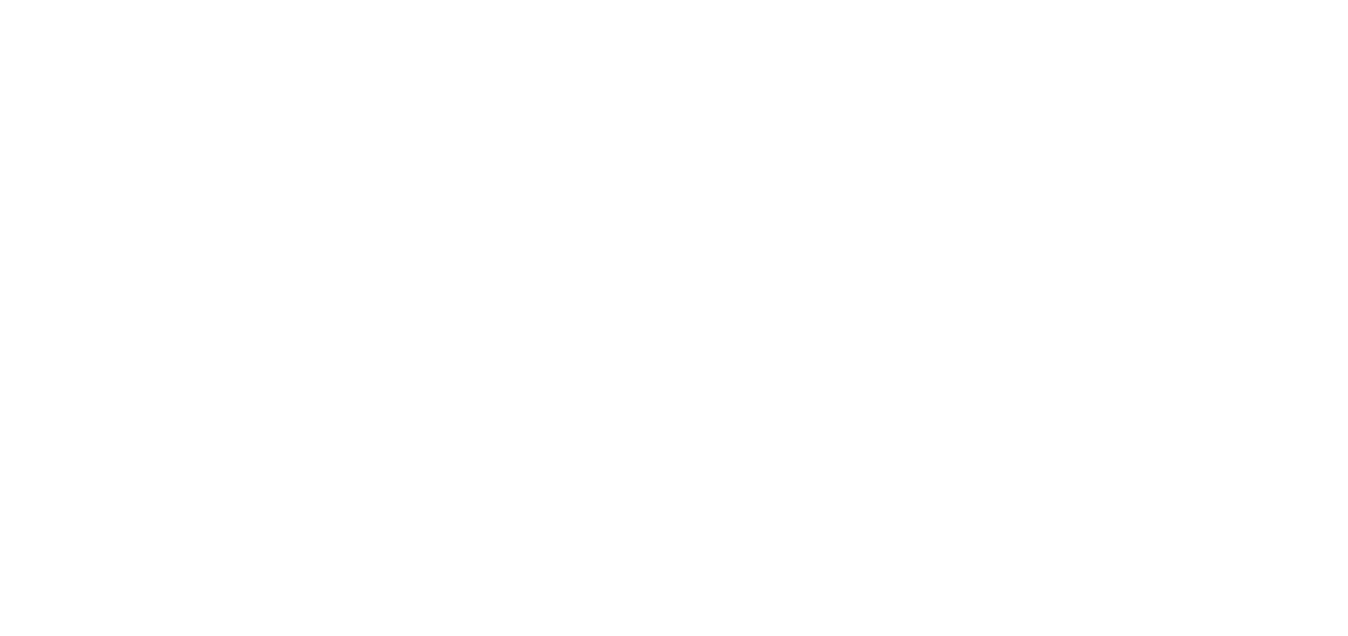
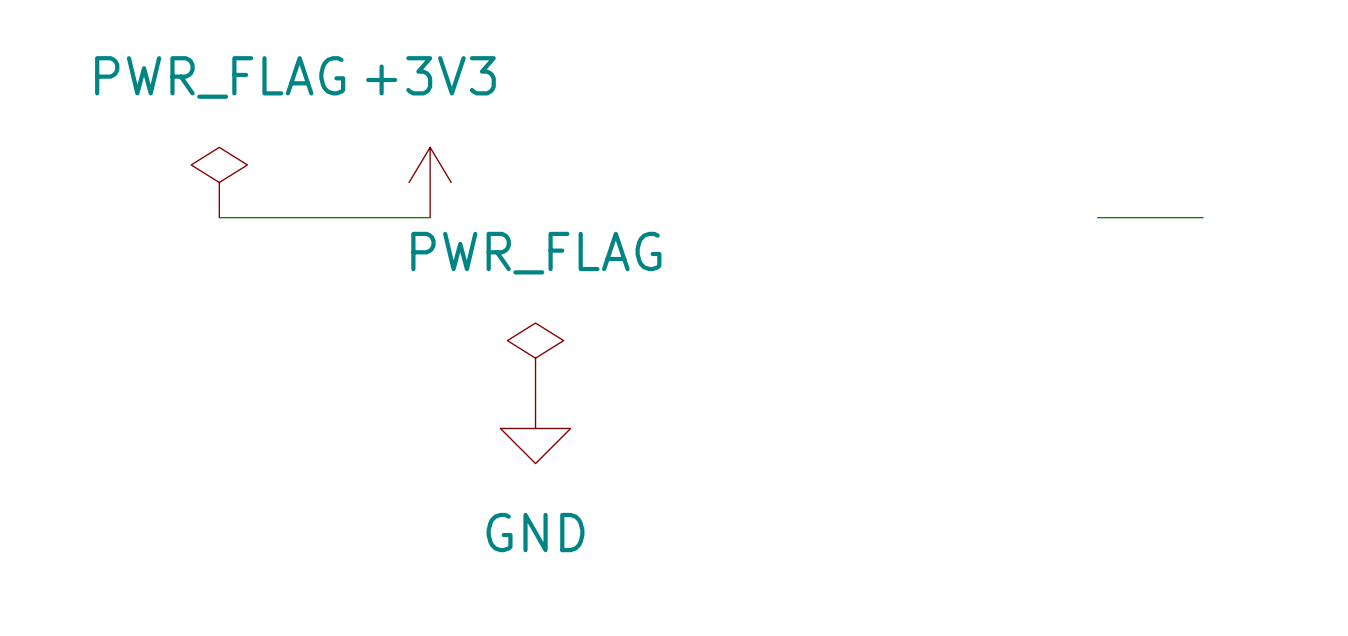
power symbol: none -> PWR_FLAG (219, 182)
power symbol: none -> +3V3 (430, 182)
wire: none -> (219, 217) (430, 217)
wire: none -> (1097, 217) (1203, 217)
power symbol: none -> PWR_FLAG (535, 358)
power symbol: none -> GND (535, 428)

